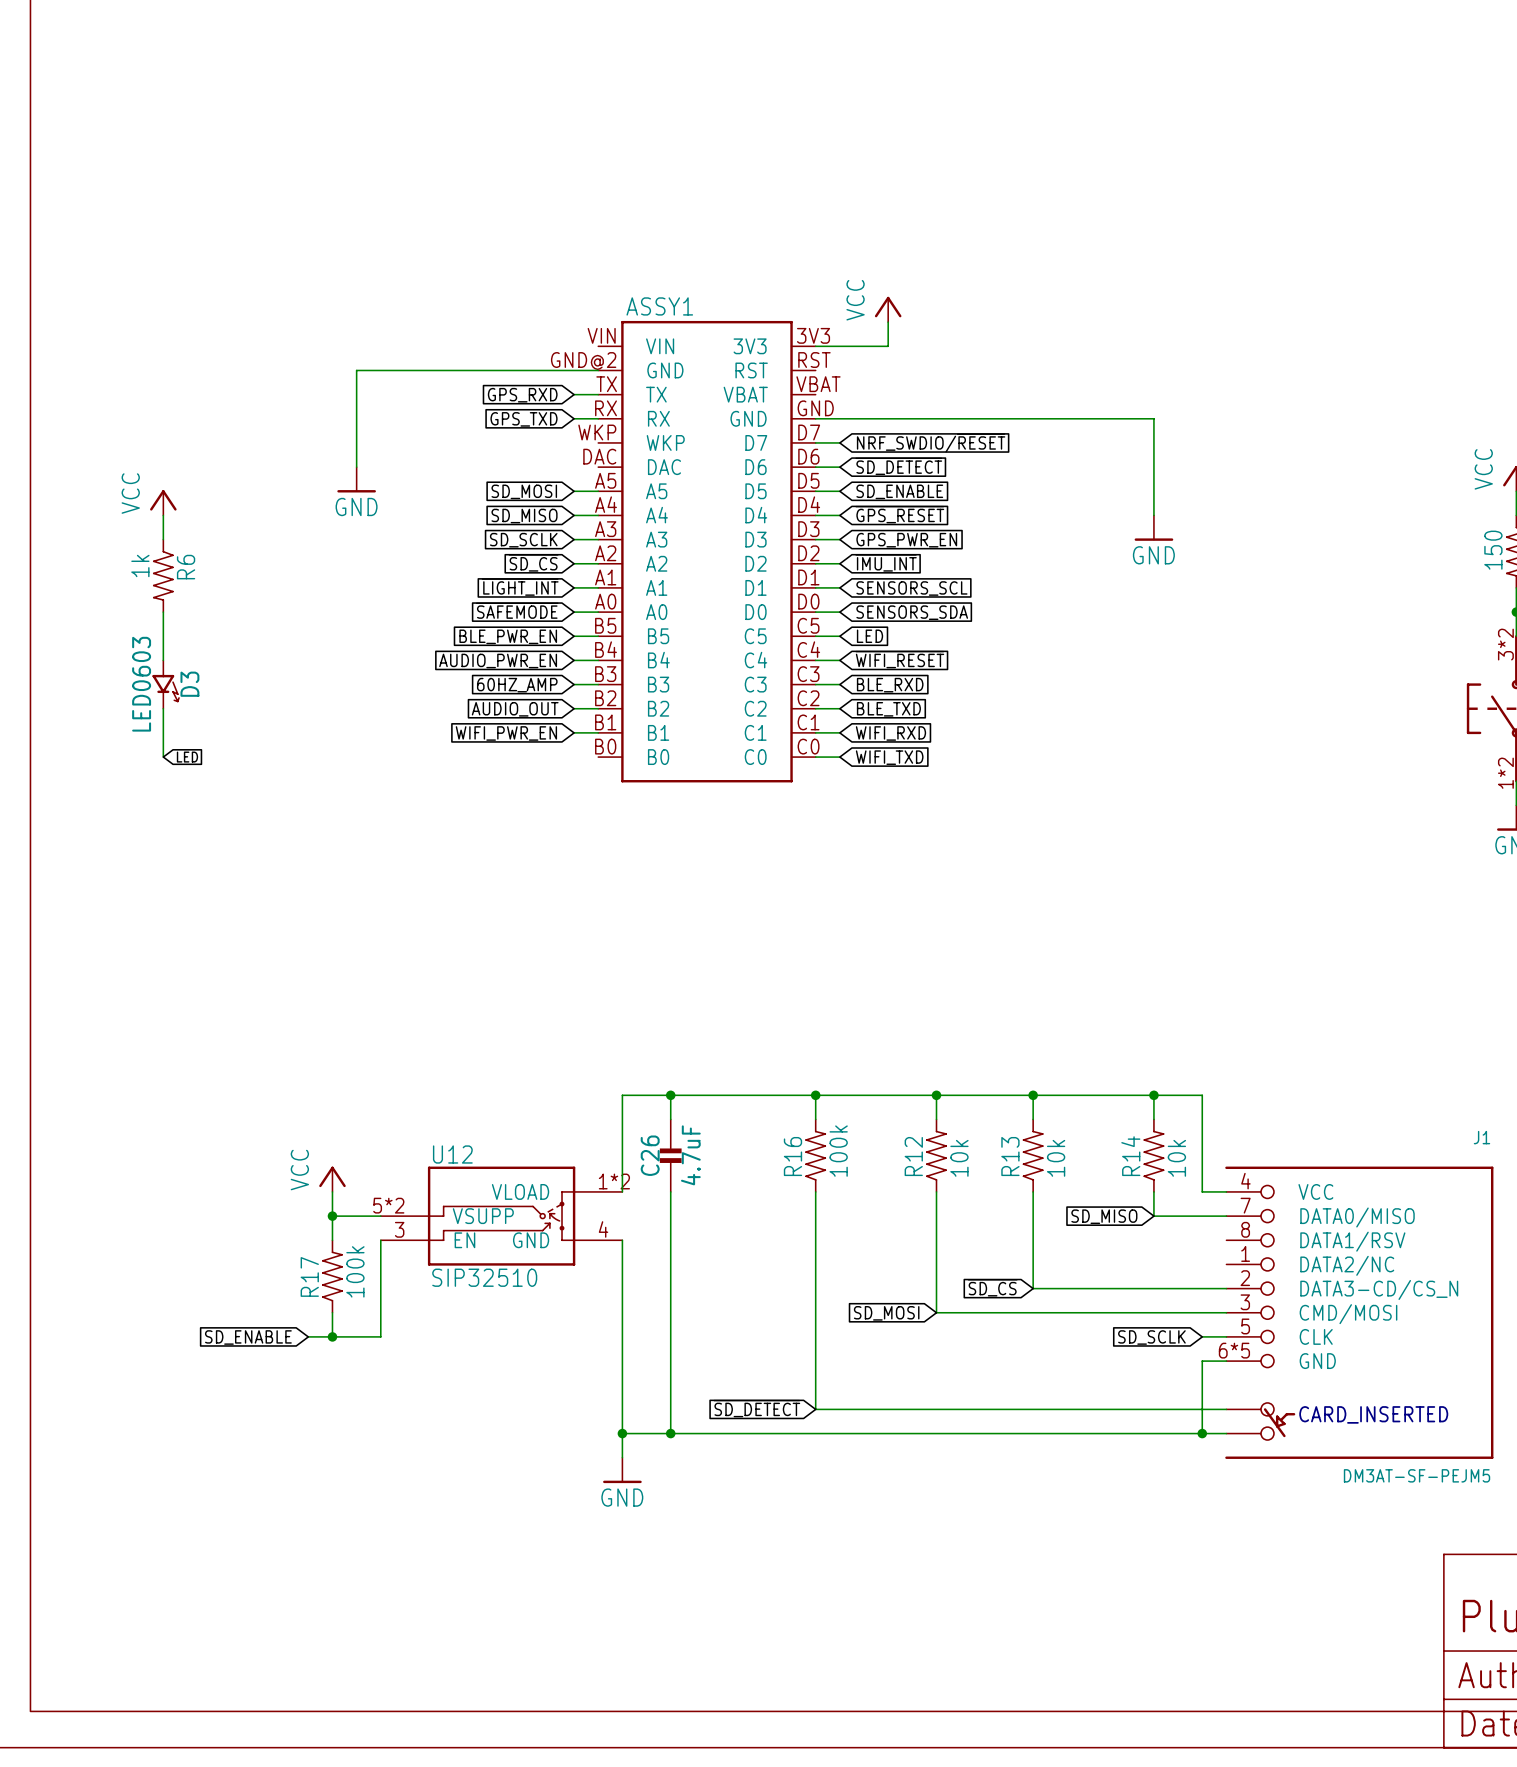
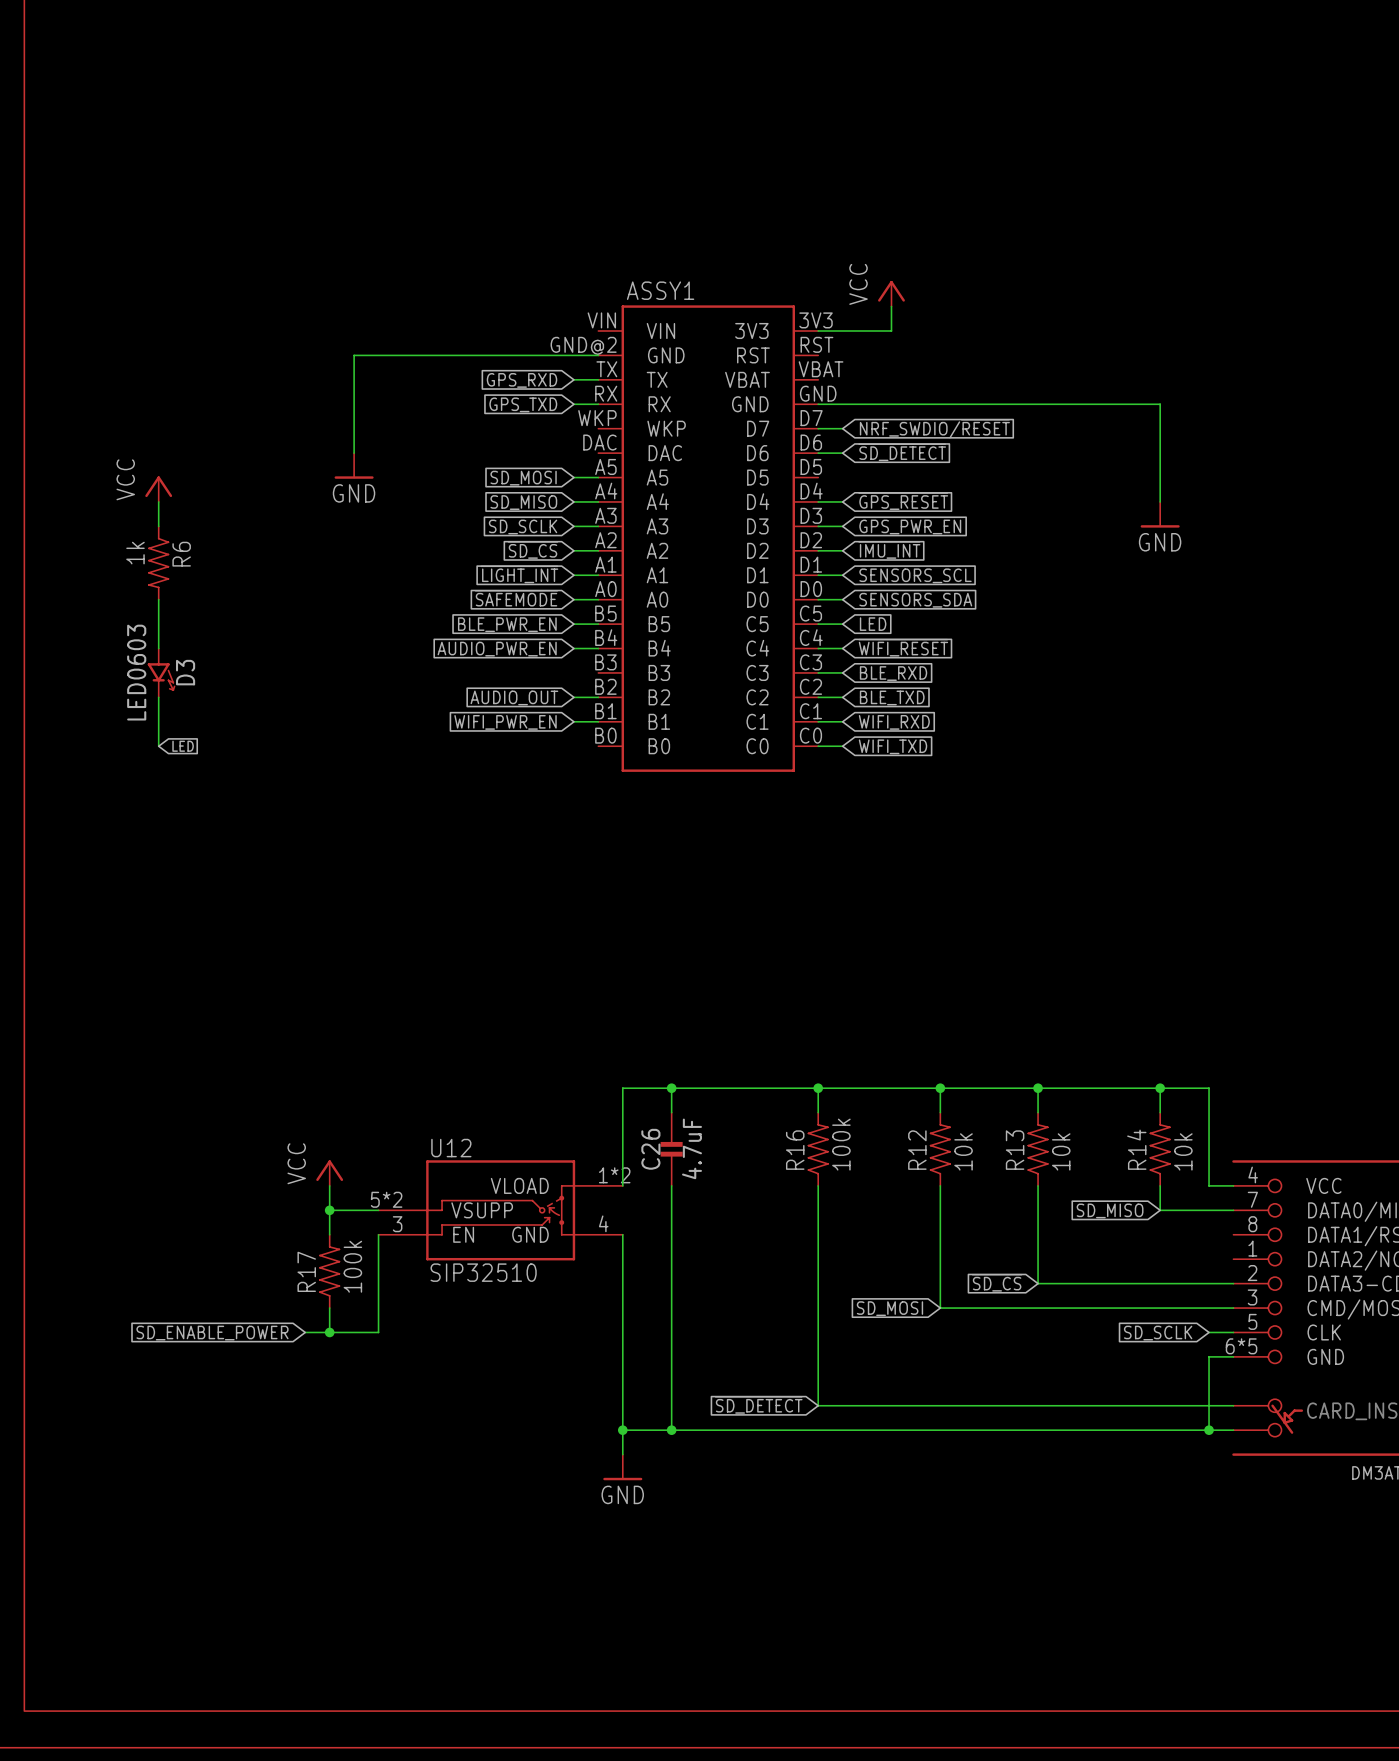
wire: (815, 491) (839, 491) -> none
global label: SD_ENABLE (899, 491) -> none
wire: (574, 684) (598, 684) -> none
global label: 60HZ_AMP (517, 685) -> none
global label: SD_ENABLE (248, 1337) -> SD_ENABLE_POWER (212, 1333)

